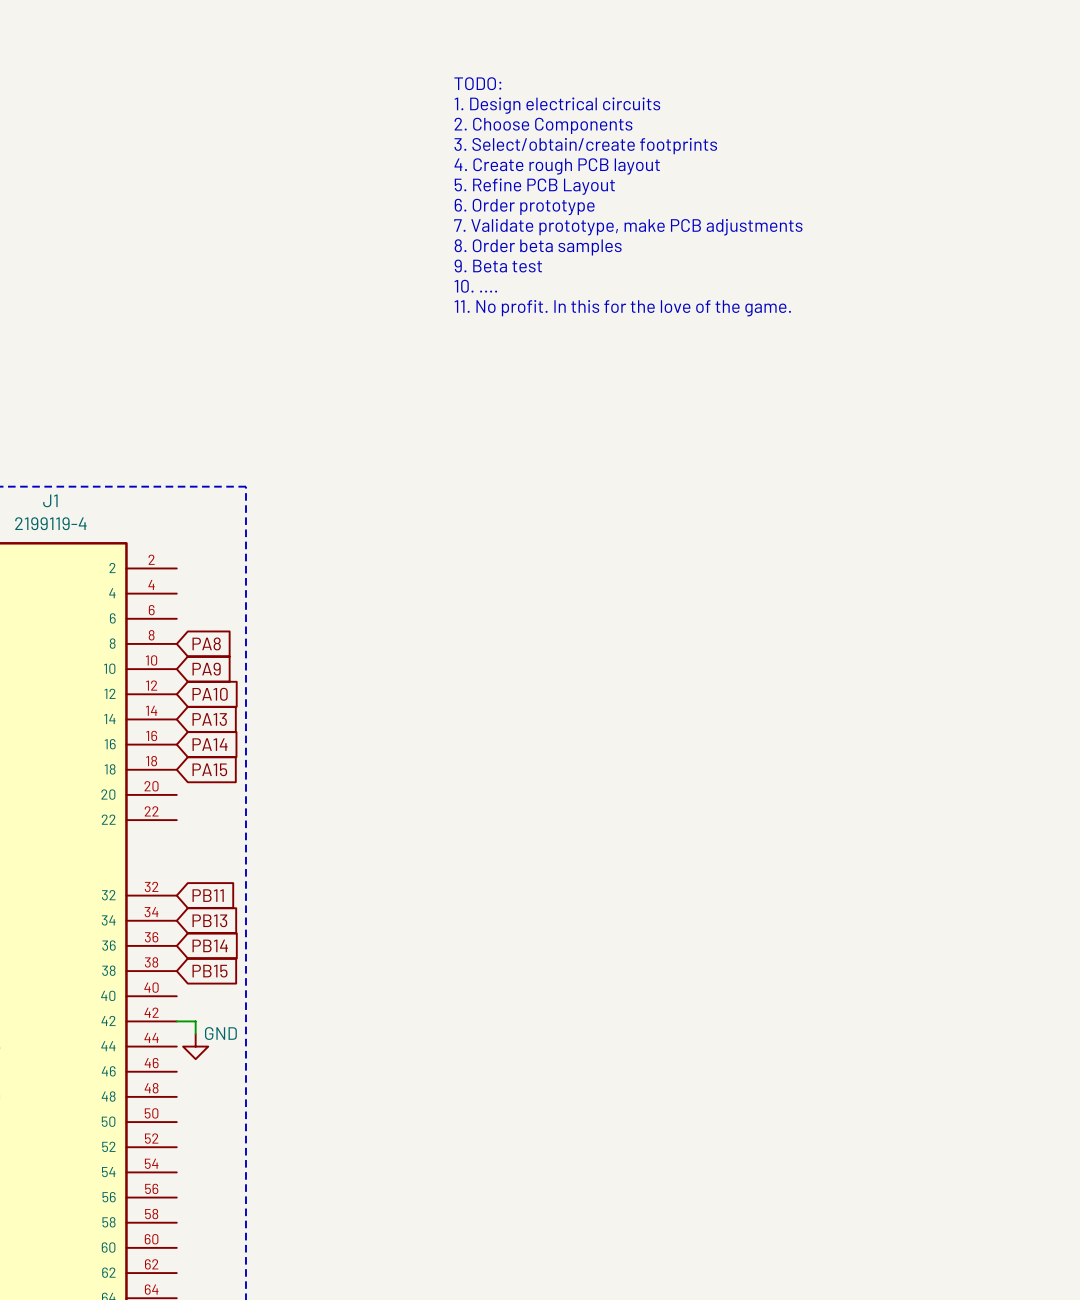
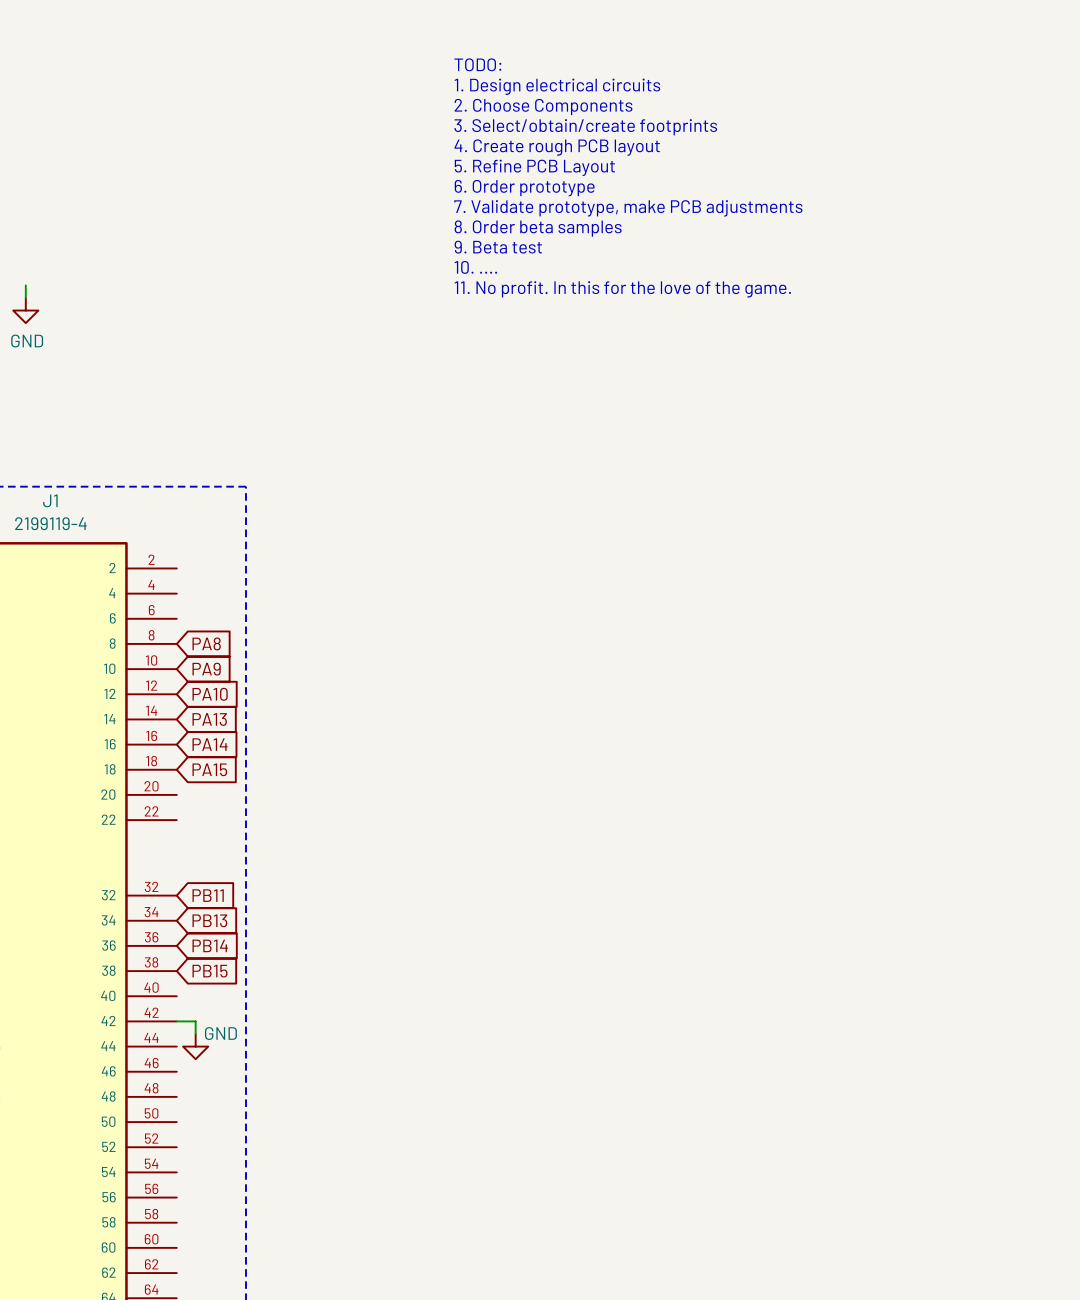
text position: TODO: (477, 83) -> TODO: (477, 64)
text position: 1. Design electrical circuits (557, 105) -> 1. Design electrical circuits (557, 86)
text position: 2. Choose Components (543, 125) -> 2. Choose Components (543, 107)
text position: 3. Select/obtain/create footprints (585, 146) -> 3. Select/obtain/create footprints (585, 127)
text position: 4. Create rough PCB layout (557, 166) -> 4. Create rough PCB layout (557, 147)
text position: 5. Refine PCB Layout (534, 186) -> 5. Refine PCB Layout (534, 167)
text position: 6. Order prototype (524, 206) -> 6. Order prototype (524, 188)
text position: 7. Validate prototype, make PCB adjustments (628, 227) -> 7. Validate prototype, make PCB adjustments (628, 208)
text position: 8. Order beta samples (538, 247) -> 8. Order beta samples (538, 228)
text position: 9. Beta test (498, 266) -> 9. Beta test (498, 247)
wire: none -> (25, 285) (25, 297)
text position: 10. .... (475, 286) -> 10. .... (475, 267)
text position: 11. No profit. In this for the love of the game. (622, 308) -> 11. No profit. In this for the love of the game. (622, 289)
power symbol: none -> GND (25, 310)

